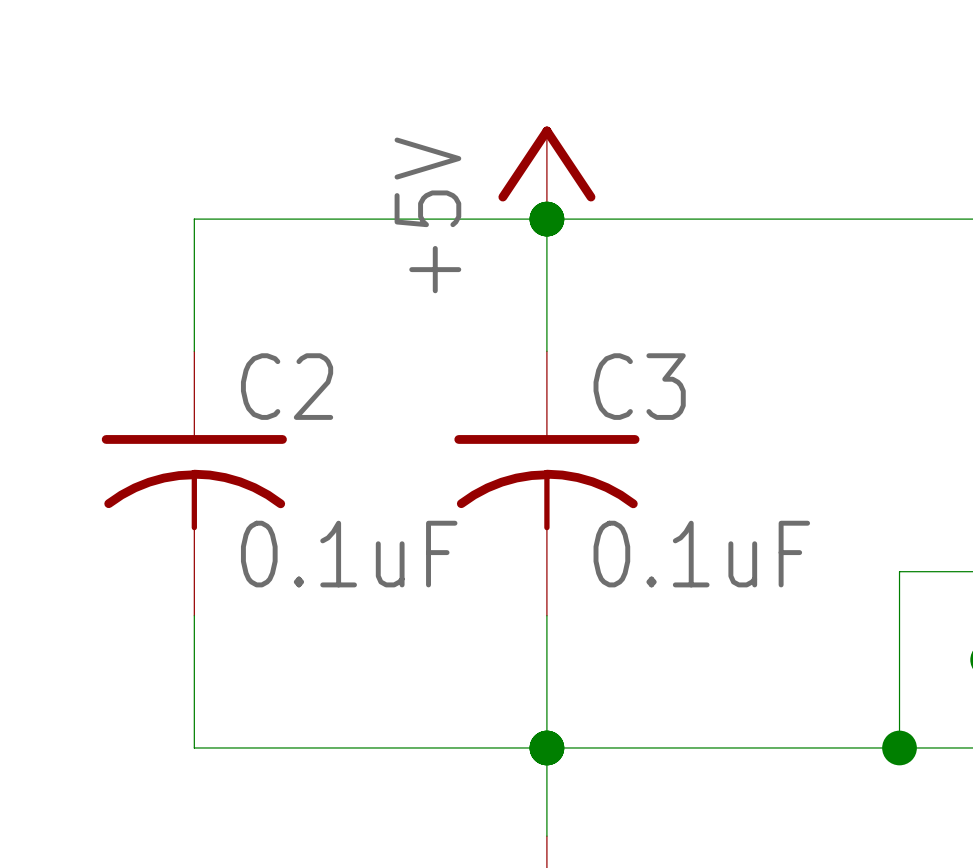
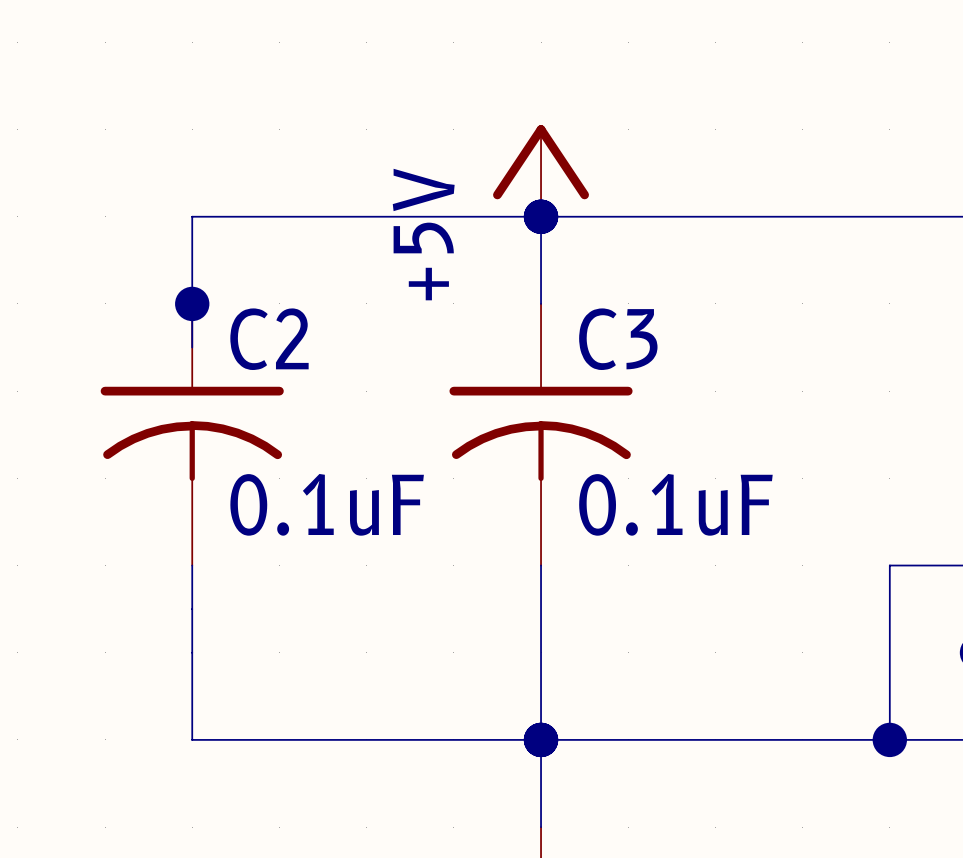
junction: none -> (192, 303)
C2 position: (194, 483) -> (192, 434)
C3 position: (546, 483) -> (541, 434)

